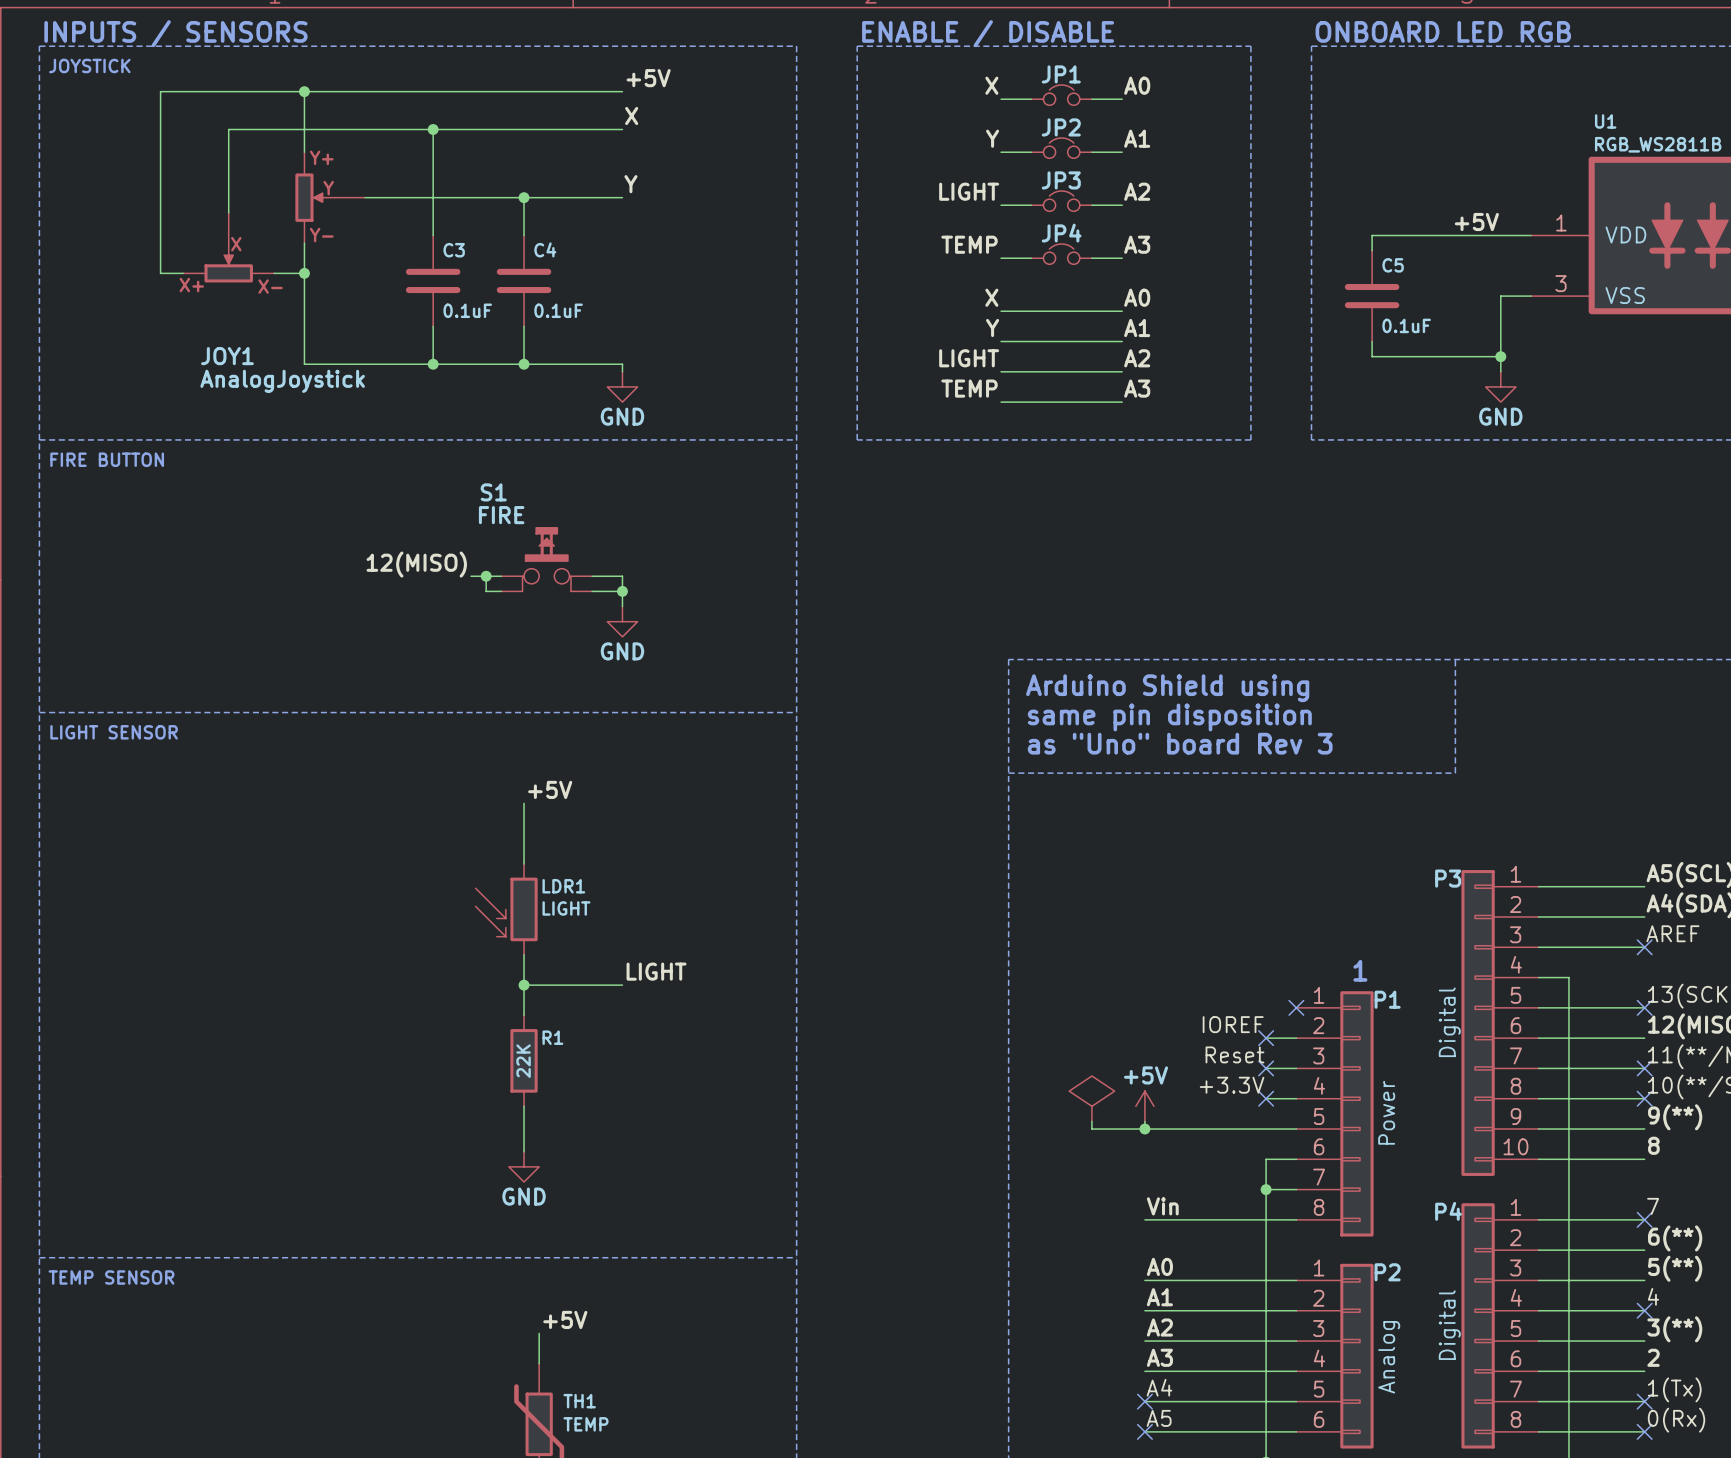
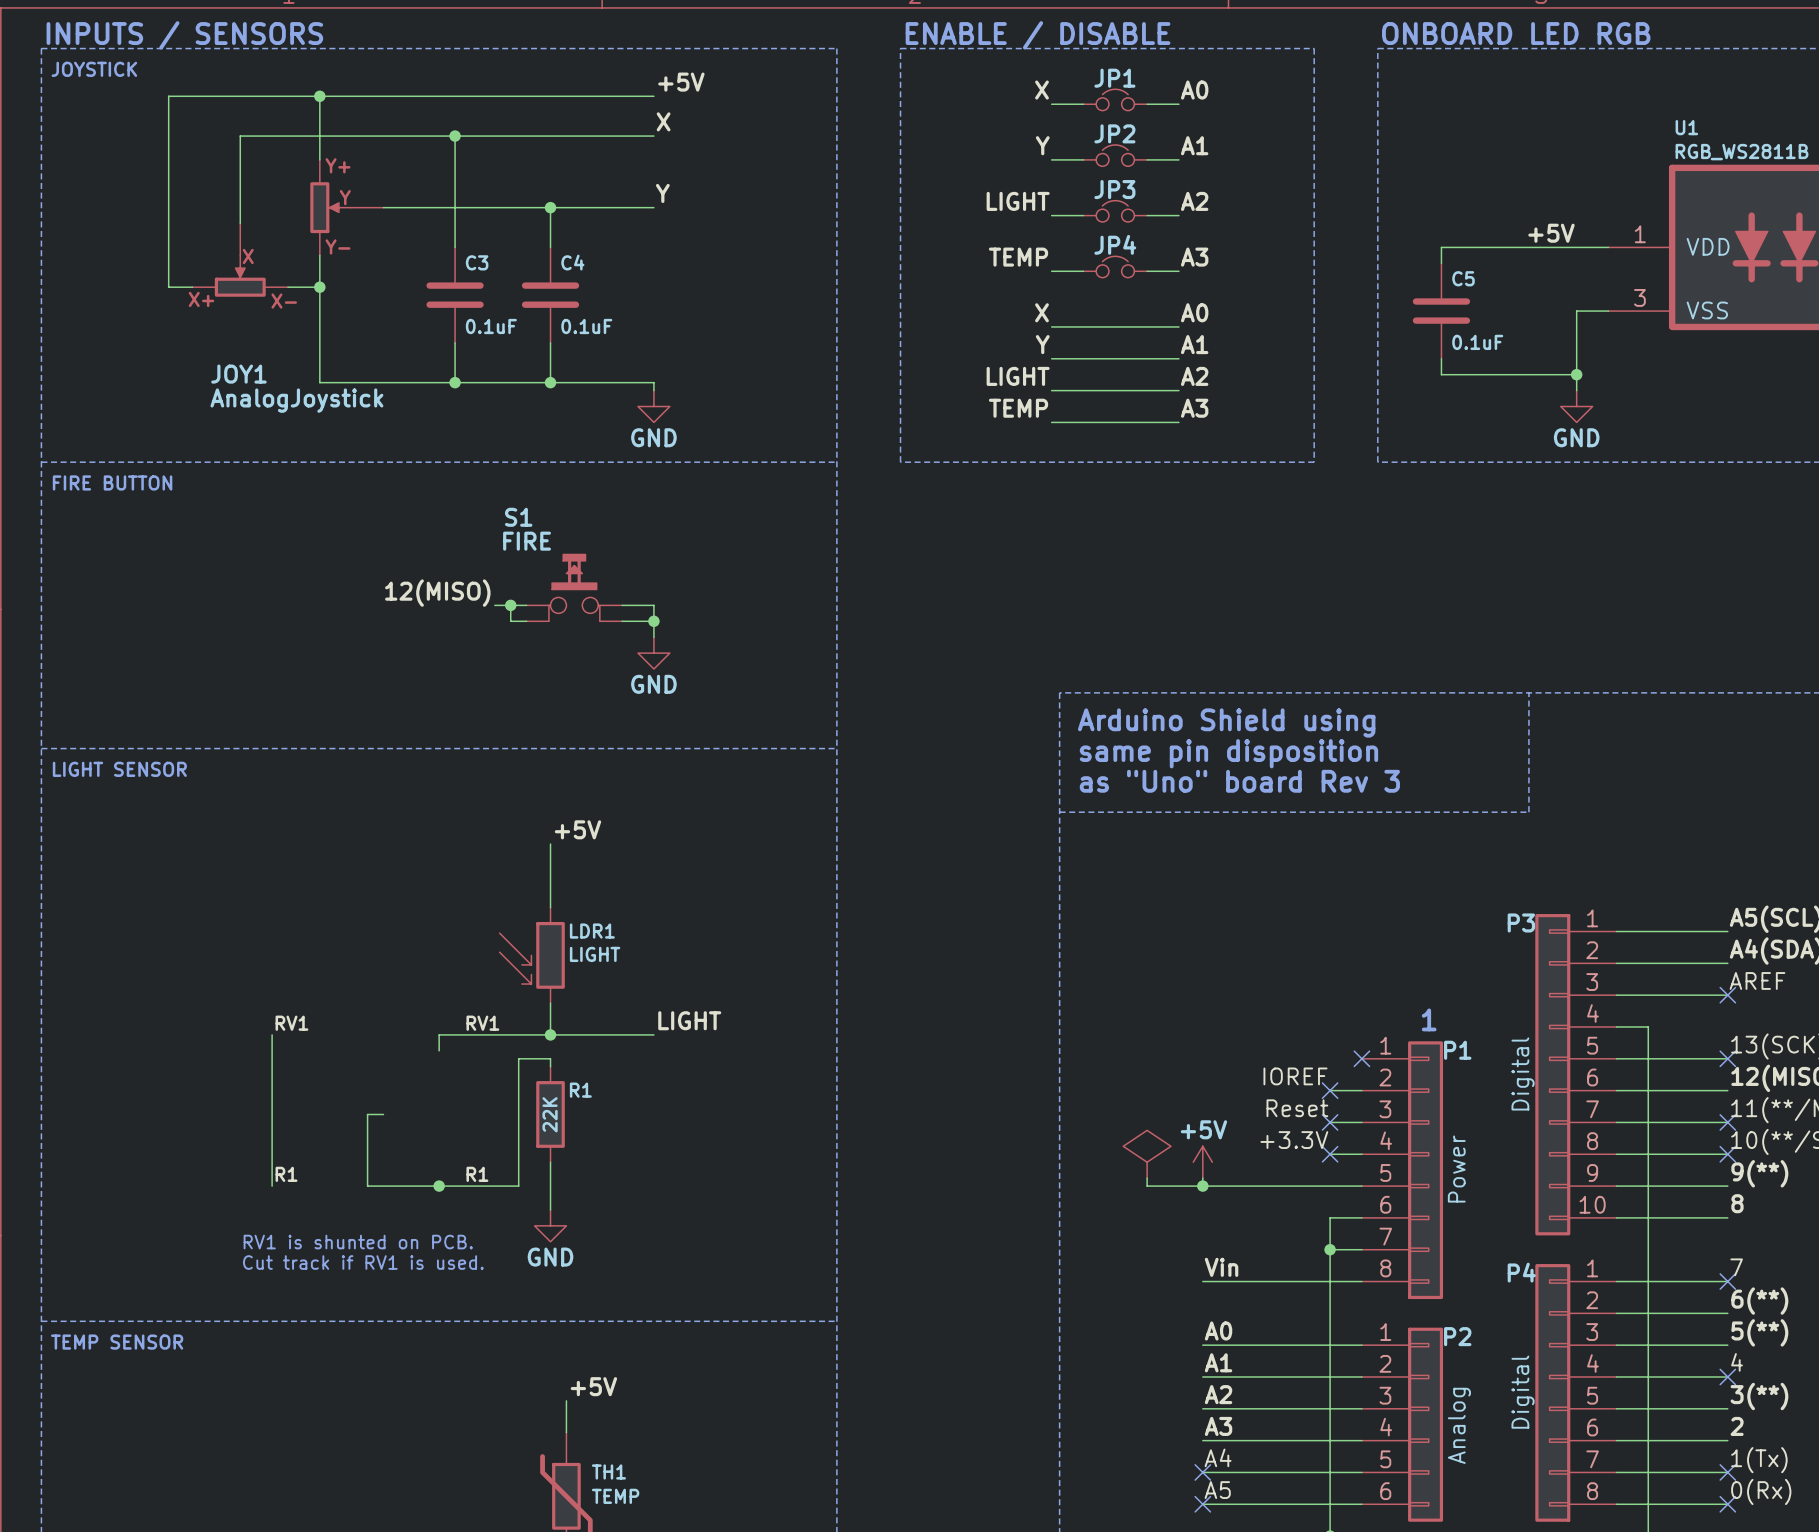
label: none -> RV1 (291, 1023)
label: none -> RV1 (482, 1023)
wire: none -> (272, 1034) (272, 1186)
wire: (524, 985) (524, 1007) -> (550, 1034) (439, 1034) (439, 1050)
wire: none -> (550, 1058) (518, 1058) (518, 1186) (367, 1186) (367, 1114) (383, 1114)
label: none -> R1 (286, 1174)
label: none -> R1 (477, 1174)
junction: none -> (439, 1186)
text: none -> RV1 is shunted on PCB. (358, 1242)
text: none -> Cut track if RV1 is used. (363, 1262)

